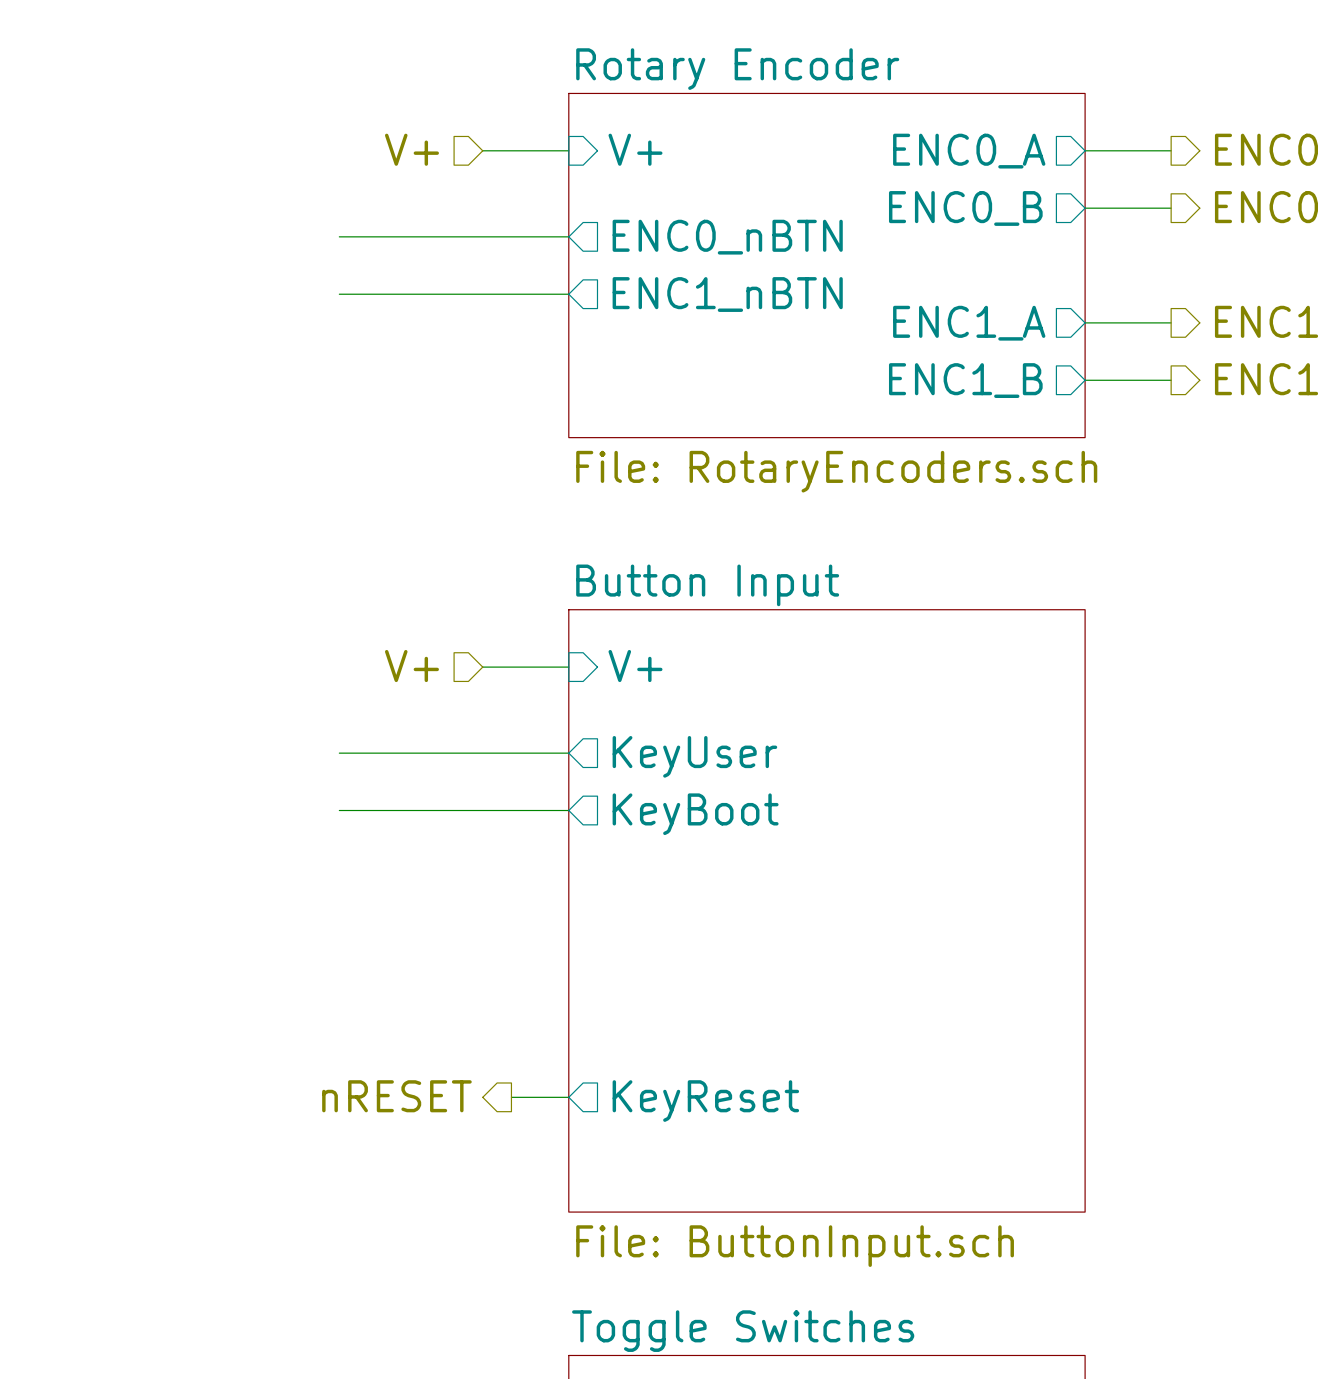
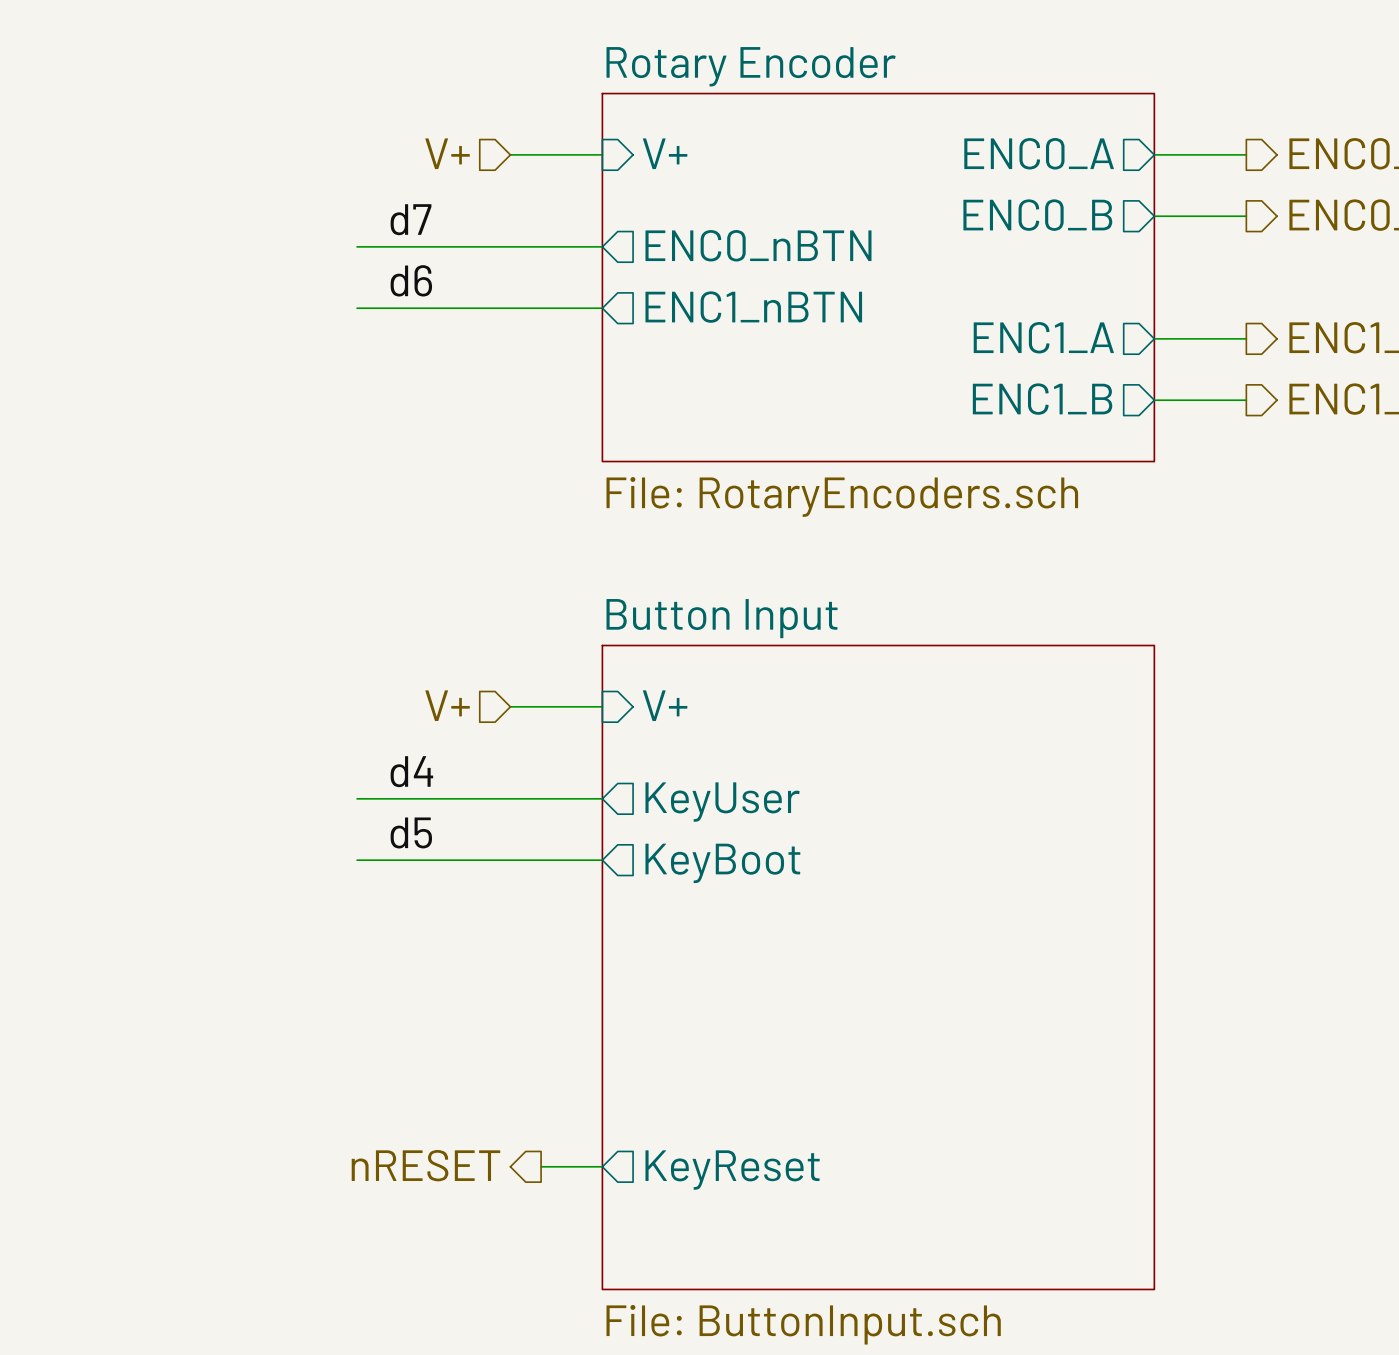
label: none -> d7 (411, 219)
label: none -> d6 (411, 280)
label: none -> d4 (411, 771)
label: none -> d5 (411, 832)

